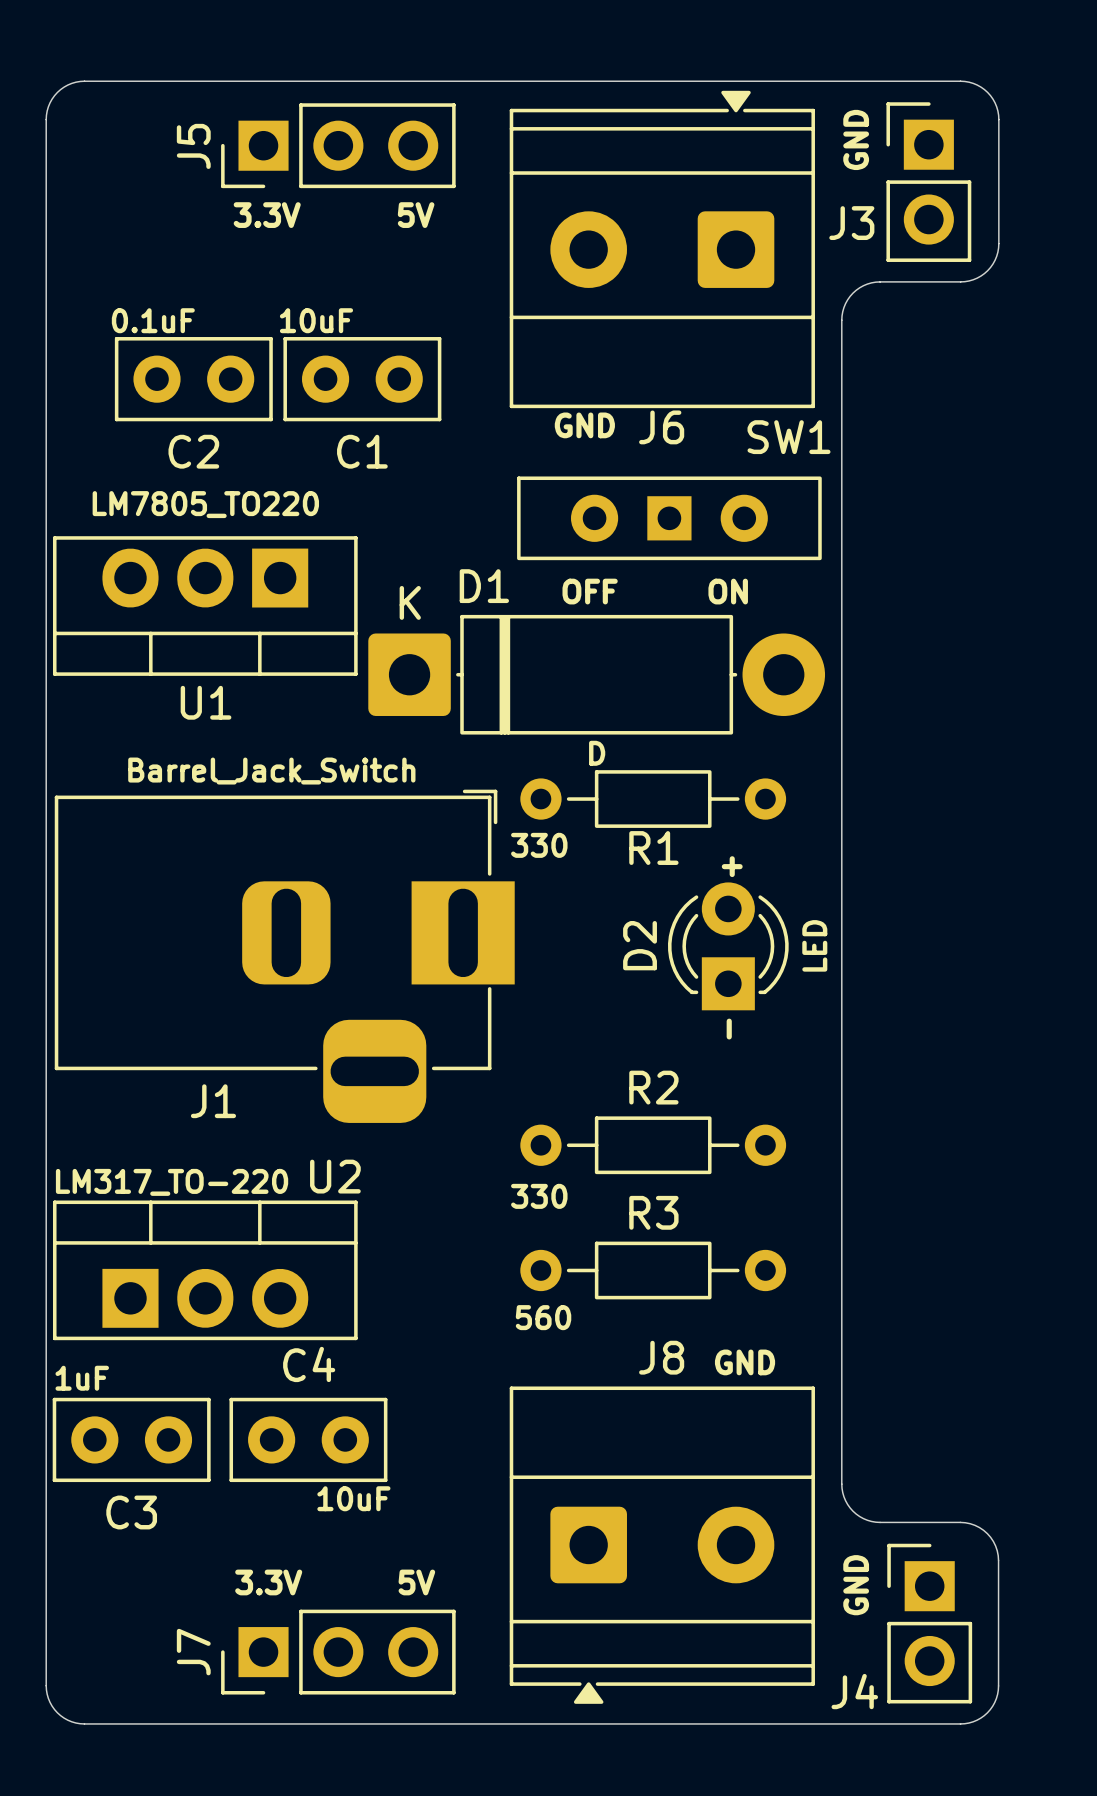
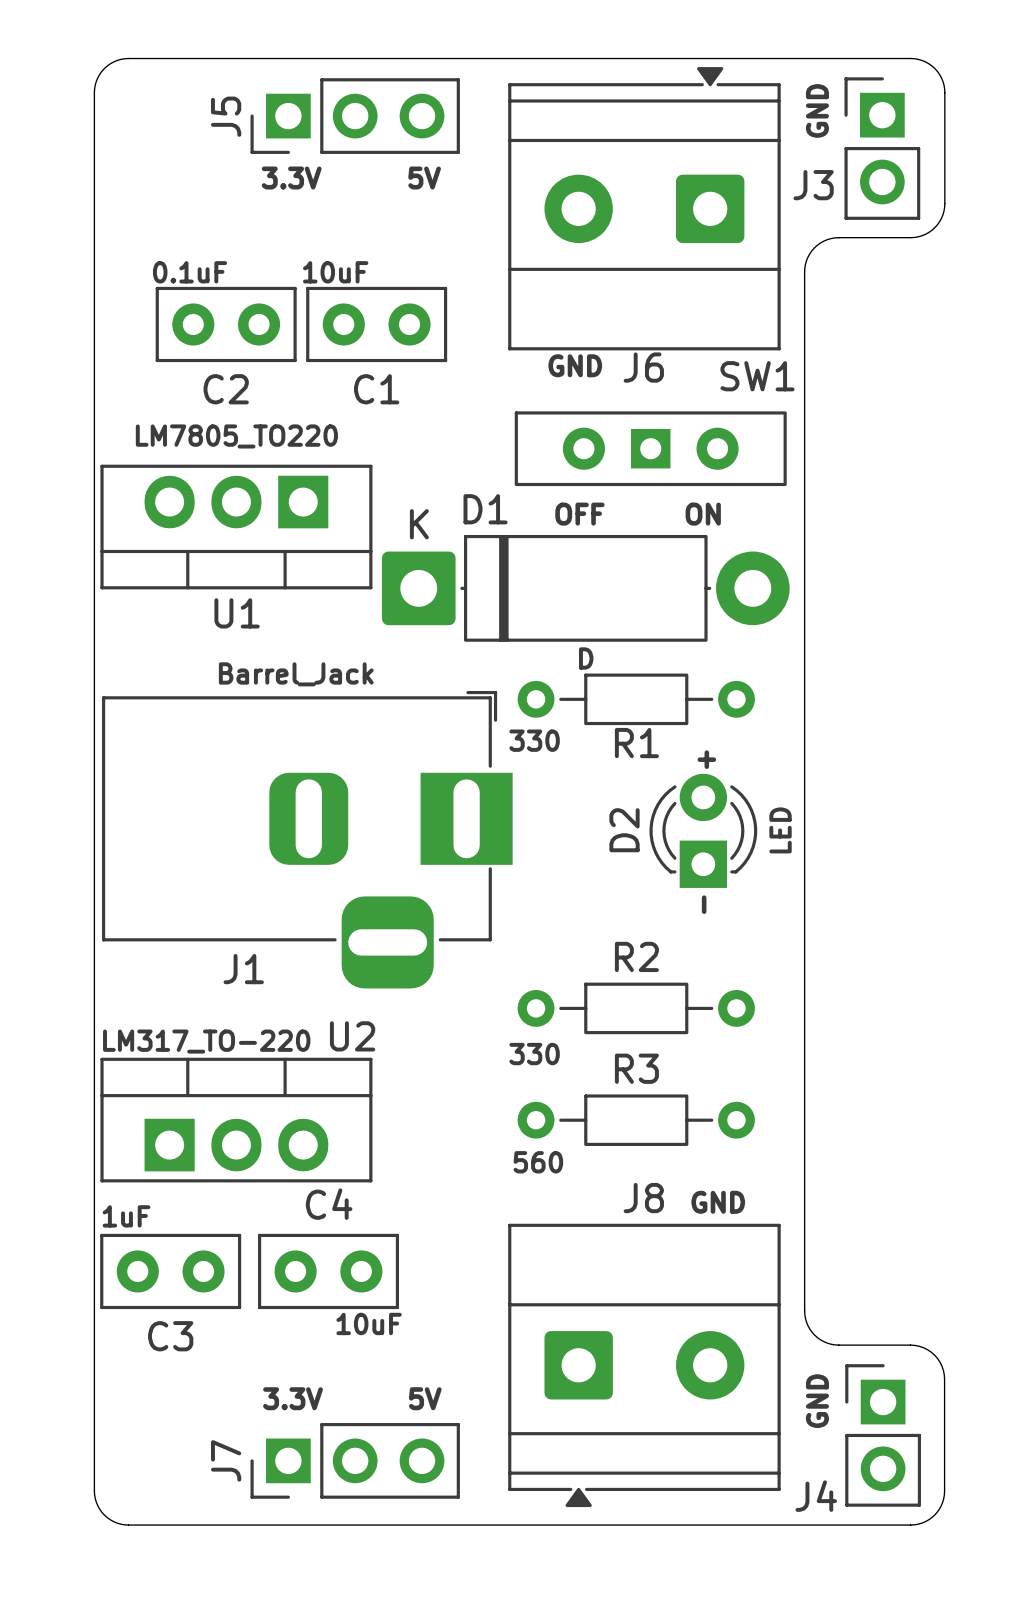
J1 value: Barrel_Jack_Switch (271, 771) -> Barrel_Jack (296, 674)

